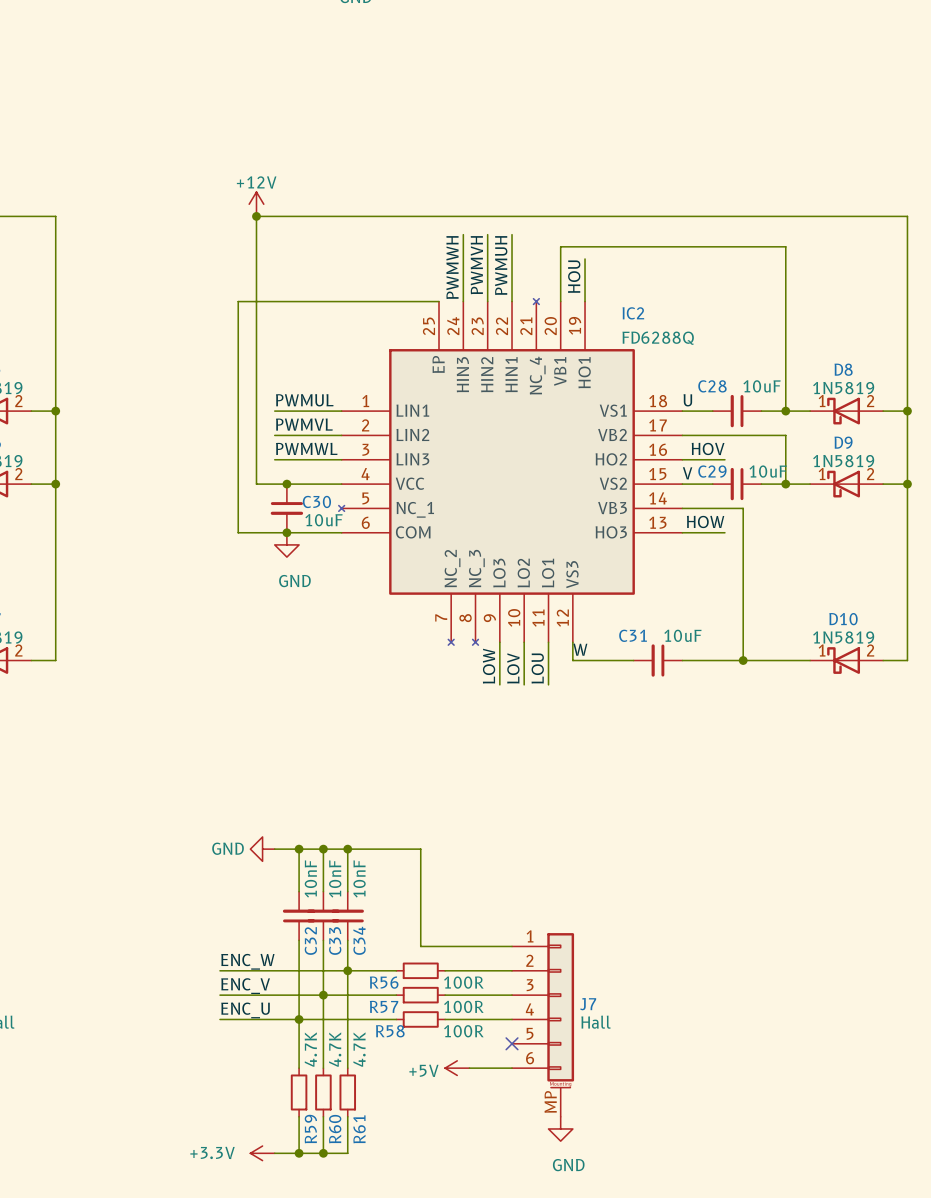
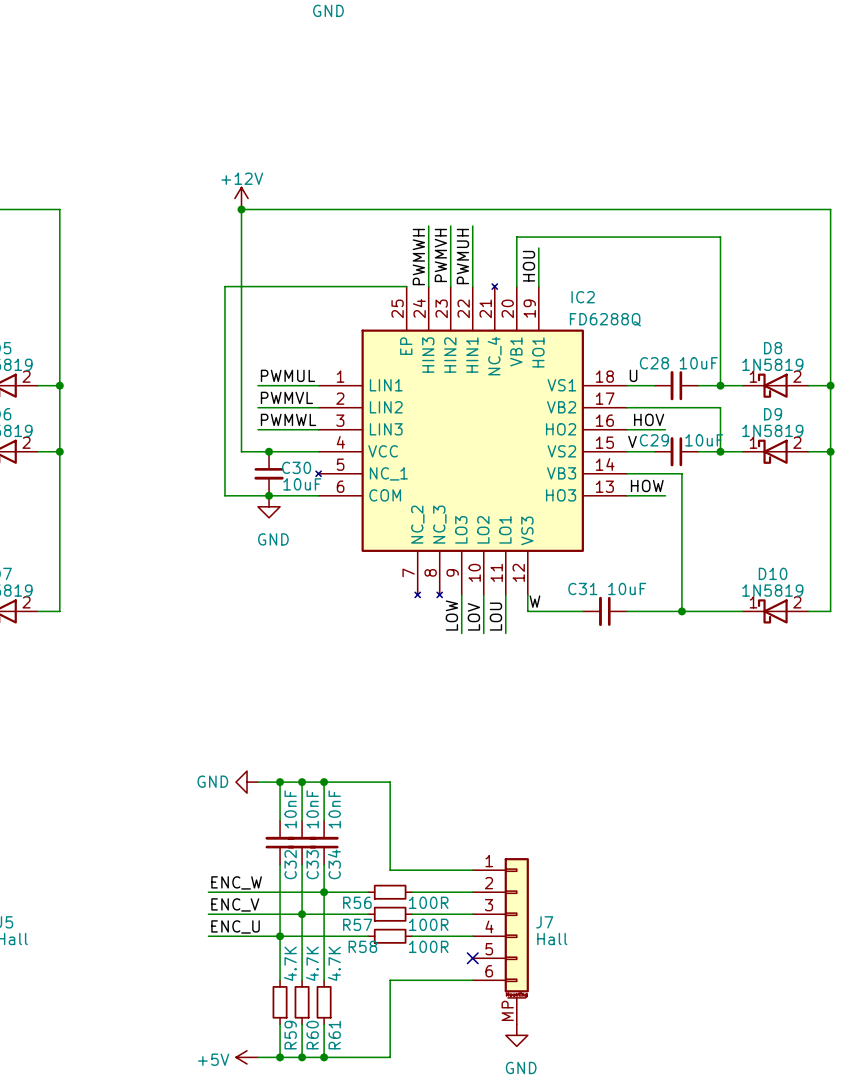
power symbol: +5V (457, 1068) -> none
wire: none -> (434, 980) (390, 980) (390, 1057) (324, 1057)
power symbol: +3.3V (262, 1153) -> +5V (247, 1057)
junction: none -> (324, 1057)

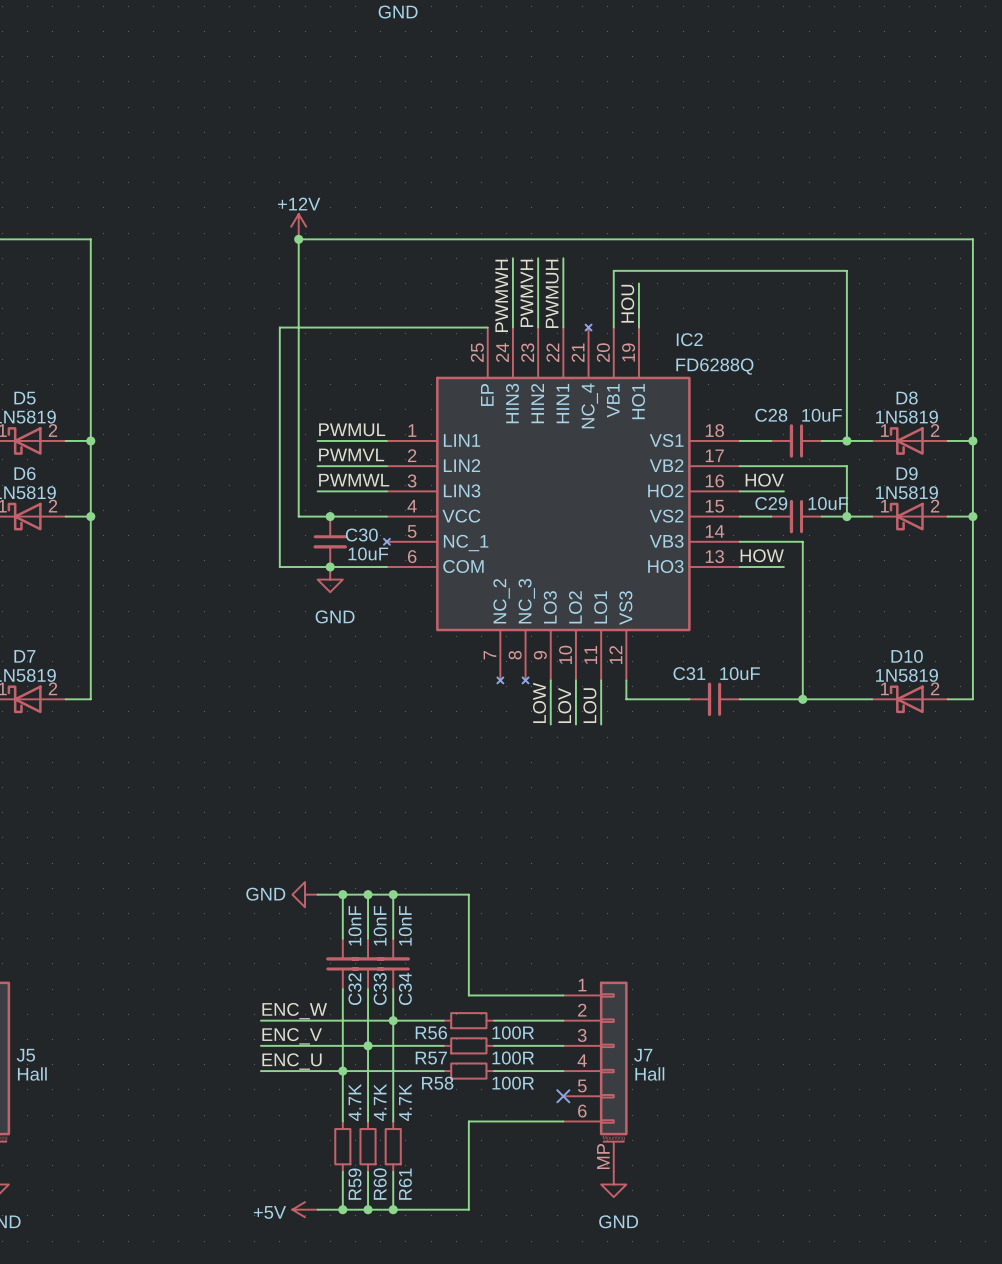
label: U (633, 375) -> none
label: V (632, 441) -> none
label: W (534, 601) -> none

